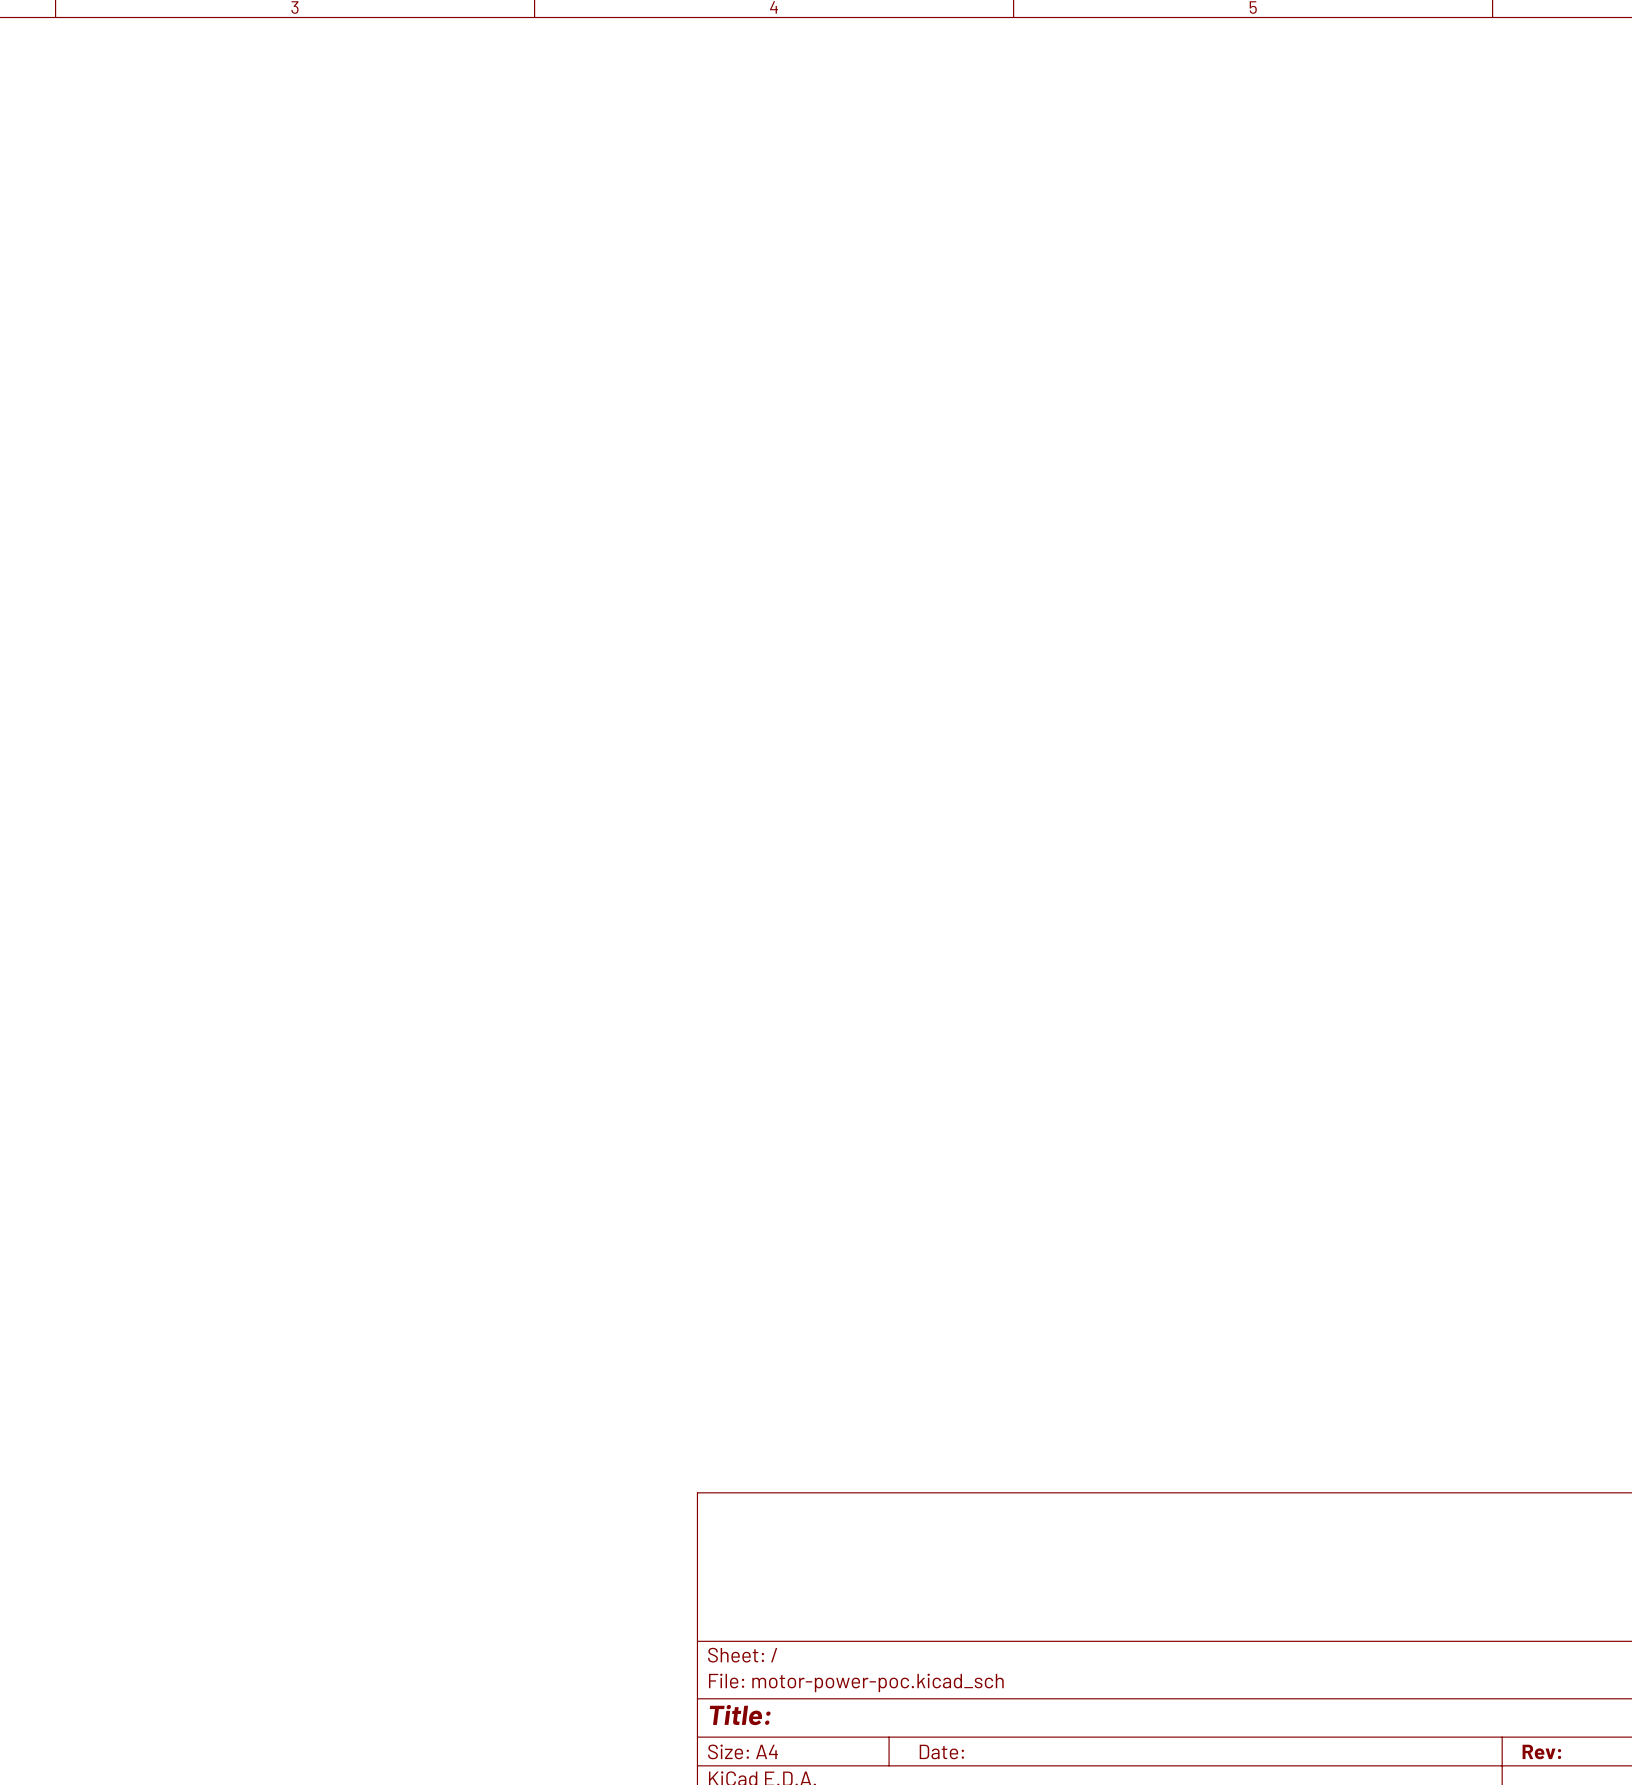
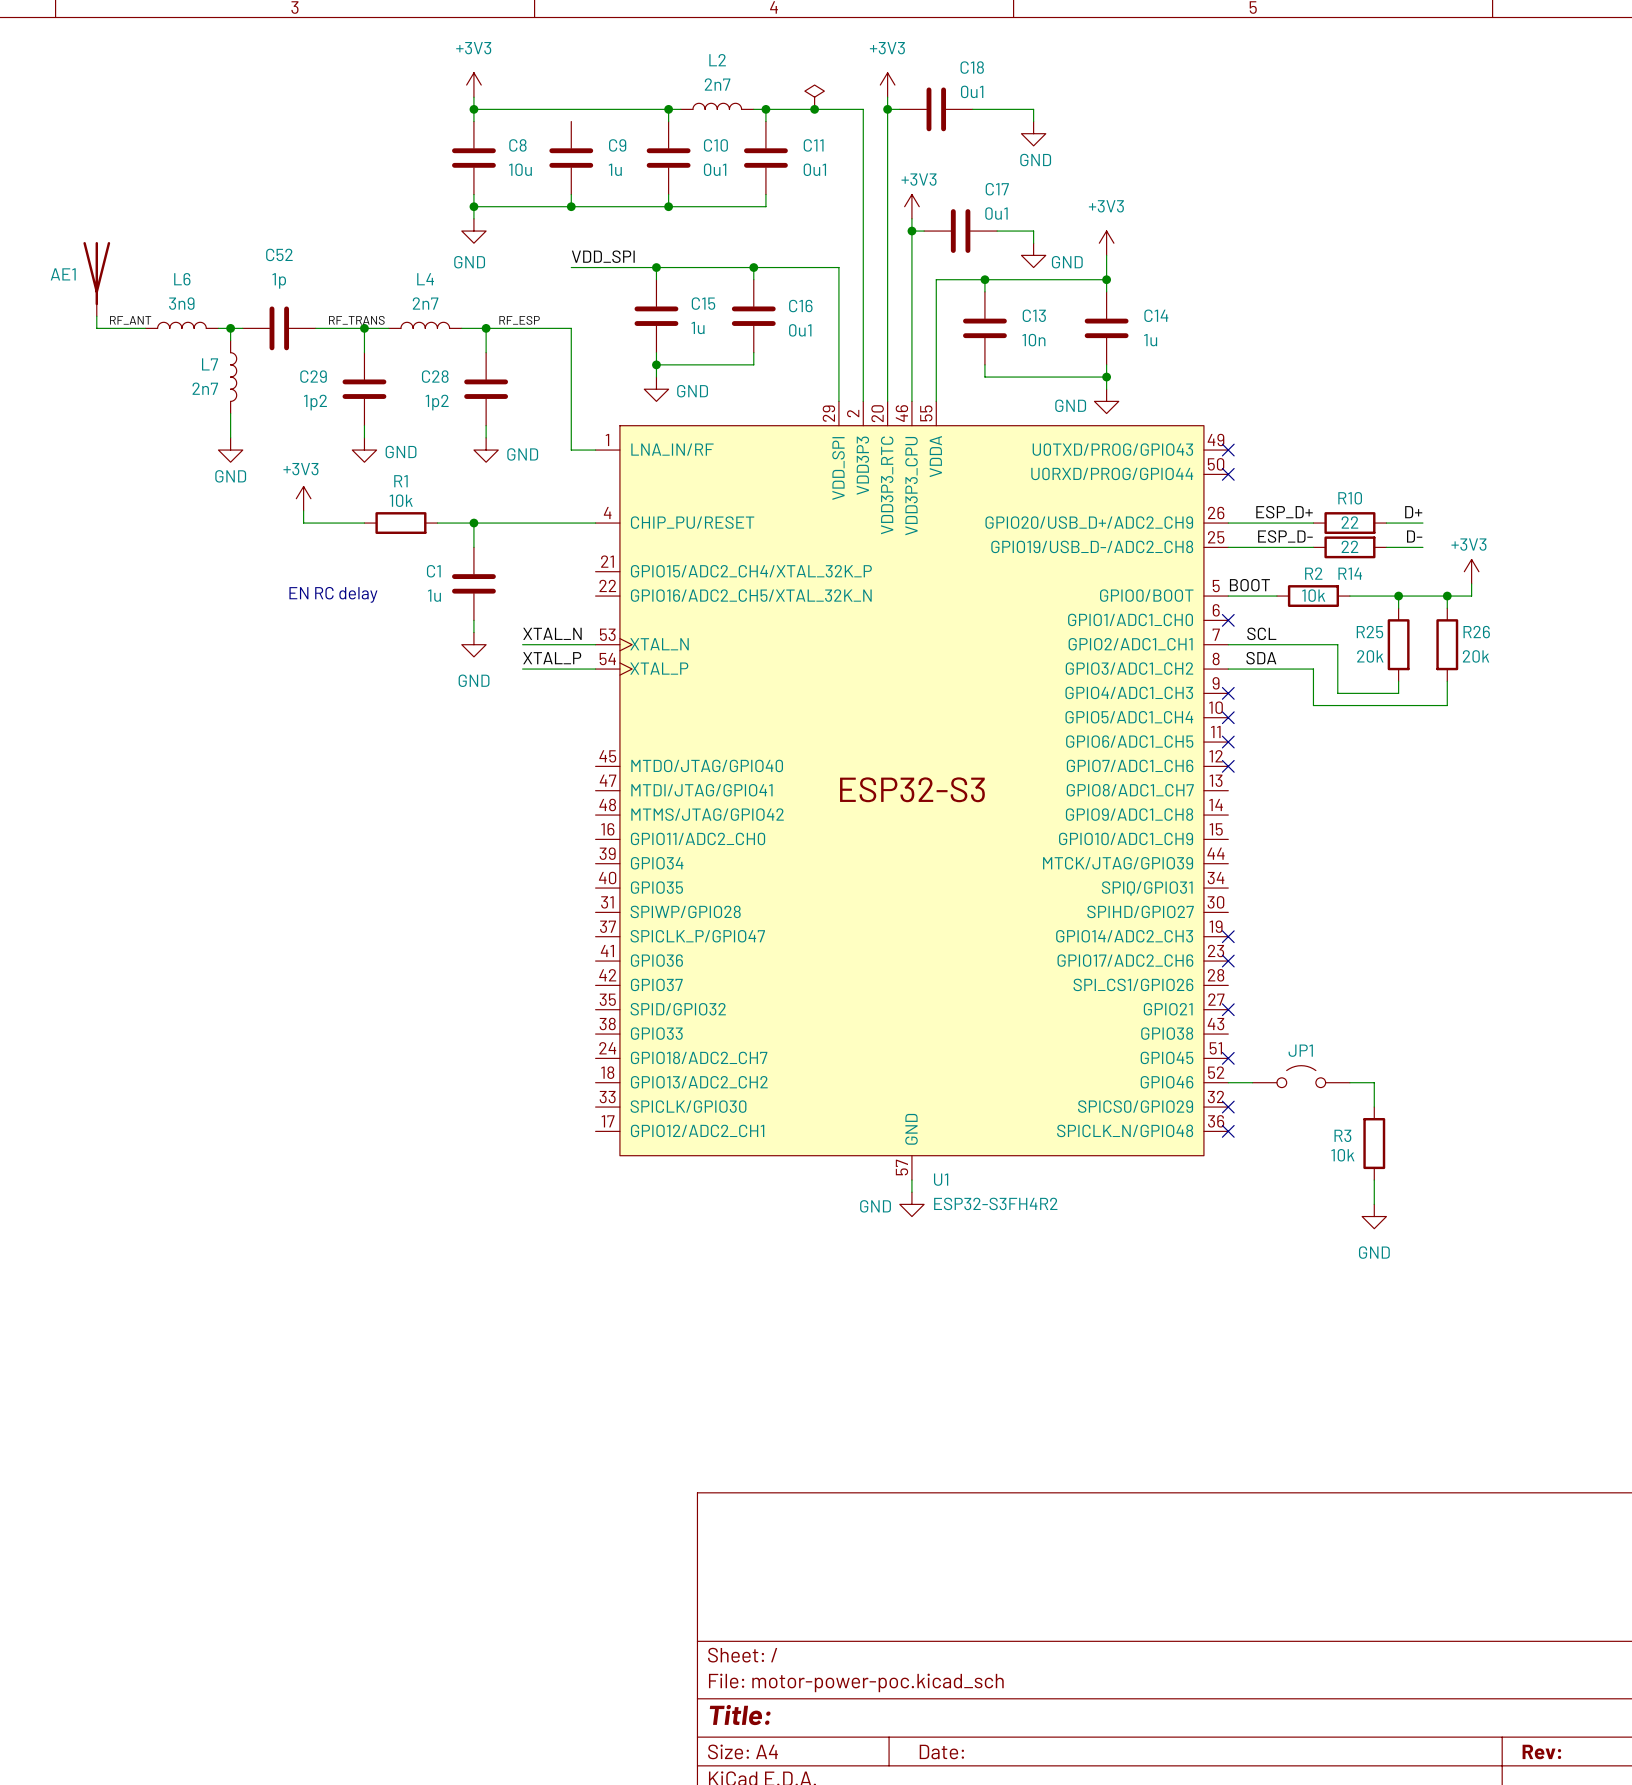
power symbol: none -> +3V3 (473, 85)
power symbol: none -> +3V3 (887, 85)
wire: none -> (473, 97) (473, 121)
power symbol: none -> (814, 97)
wire: none -> (887, 97) (887, 401)
L2: none -> 2n7 (717, 106)
wire: none -> (473, 109) (680, 109)
junction: none -> (473, 109)
wire: none -> (668, 109) (668, 121)
junction: none -> (668, 109)
wire: none -> (753, 109) (863, 109) (863, 401)
wire: none -> (765, 109) (765, 121)
junction: none -> (765, 109)
junction: none -> (814, 109)
wire: none -> (887, 109) (899, 109)
junction: none -> (887, 109)
C18: none -> 0u1 (936, 109)
wire: none -> (972, 109) (1033, 109) (1033, 121)
power symbol: none -> GND (1033, 133)
C8: none -> 10u (473, 158)
C9: none -> 1u (571, 158)
C10: none -> 0u1 (668, 158)
C11: none -> 0u1 (765, 158)
wire: none -> (473, 194) (473, 218)
wire: none -> (571, 194) (571, 206)
wire: none -> (668, 194) (668, 206)
wire: none -> (765, 194) (765, 206) (473, 206)
junction: none -> (473, 206)
junction: none -> (571, 206)
junction: none -> (668, 206)
power symbol: none -> +3V3 (911, 206)
wire: none -> (911, 218) (911, 401)
power symbol: none -> GND (473, 231)
wire: none -> (911, 231) (924, 231)
junction: none -> (911, 231)
C17: none -> 0u1 (960, 231)
wire: none -> (997, 231) (1033, 231) (1033, 243)
power symbol: none -> +3V3 (1106, 243)
power symbol: none -> GND (1033, 255)
wire: none -> (1106, 255) (1106, 291)
label: none -> VDD_SPI (603, 256)
wire: none -> (571, 267) (838, 267) (838, 401)
wire: none -> (656, 267) (656, 279)
junction: none -> (656, 267)
wire: none -> (753, 267) (753, 279)
junction: none -> (753, 267)
AE1: none -> (96, 279)
wire: none -> (984, 279) (984, 291)
junction: none -> (984, 279)
wire: none -> (1106, 279) (936, 279) (936, 401)
junction: none -> (1106, 279)
wire: none -> (96, 316) (96, 328) (145, 328)
C15: none -> 1u (656, 316)
C16: none -> 0u1 (753, 316)
label: none -> RF_ANT (130, 320)
label: none -> RF_TRANS (356, 320)
label: none -> RF_ESP (519, 320)
L6: none -> 3n9 (181, 325)
L4: none -> 2n7 (425, 325)
wire: none -> (218, 328) (242, 328)
wire: none -> (230, 328) (230, 340)
junction: none -> (230, 328)
C52: none -> 1p (279, 328)
wire: none -> (315, 328) (388, 328)
wire: none -> (364, 328) (364, 352)
junction: none -> (364, 328)
wire: none -> (461, 328) (571, 328) (571, 450) (595, 450)
wire: none -> (486, 328) (486, 352)
junction: none -> (486, 328)
C13: none -> 10n (984, 328)
C14: none -> 1u (1106, 328)
wire: none -> (656, 352) (656, 377)
wire: none -> (753, 352) (753, 364) (656, 364)
junction: none -> (656, 364)
wire: none -> (984, 364) (984, 377) (1106, 377)
wire: none -> (1106, 364) (1106, 389)
L7: none -> 2n7 (233, 377)
junction: none -> (1106, 377)
C29: none -> 1p2 (364, 389)
C28: none -> 1p2 (486, 389)
power symbol: none -> GND (656, 389)
power symbol: none -> GND (1106, 401)
wire: none -> (230, 413) (230, 437)
wire: none -> (364, 425) (364, 437)
wire: none -> (486, 425) (486, 437)
power symbol: none -> GND (230, 450)
power symbol: none -> GND (364, 450)
power symbol: none -> GND (486, 450)
no-connect mark: none -> (1228, 450)
no-connect mark: none -> (1228, 474)
power symbol: none -> +3V3 (303, 498)
wire: none -> (303, 510) (303, 523) (364, 523)
label: none -> ESP_D+ (1284, 512)
label: none -> D+ (1413, 512)
R1: none -> 10k (400, 523)
wire: none -> (437, 523) (595, 523)
wire: none -> (473, 523) (473, 547)
junction: none -> (473, 523)
wire: none -> (1228, 523) (1313, 523)
R10: none -> 22 (1349, 523)
wire: none -> (1386, 523) (1422, 523)
label: none -> ESP_D- (1285, 536)
label: none -> D- (1414, 536)
wire: none -> (1228, 547) (1313, 547)
R14: none -> 22 (1349, 547)
wire: none -> (1386, 547) (1422, 547)
power symbol: none -> +3V3 (1471, 571)
C1: none -> 1u (473, 583)
wire: none -> (1471, 583) (1471, 596) (1349, 596)
label: none -> BOOT (1249, 585)
text: none -> EN RC delay (333, 594)
wire: none -> (1228, 596) (1276, 596)
R2: none -> 10k (1313, 596)
wire: none -> (1398, 596) (1398, 608)
junction: none -> (1398, 596)
wire: none -> (1447, 596) (1447, 608)
junction: none -> (1447, 596)
wire: none -> (473, 620) (473, 632)
no-connect mark: none -> (1228, 620)
label: none -> XTAL_N (552, 633)
label: none -> SCL (1261, 633)
power symbol: none -> GND (473, 644)
wire: none -> (522, 644) (595, 644)
wire: none -> (1228, 644) (1337, 644) (1337, 693) (1398, 693) (1398, 681)
R25: none -> 20k (1398, 644)
R26: none -> 20k (1447, 644)
label: none -> XTAL_P (552, 658)
label: none -> SDA (1261, 658)
wire: none -> (522, 669) (595, 669)
wire: none -> (1228, 669) (1313, 669) (1313, 705) (1447, 705) (1447, 681)
no-connect mark: none -> (1228, 693)
no-connect mark: none -> (1228, 717)
no-connect mark: none -> (1228, 742)
no-connect mark: none -> (1228, 766)
U1: none -> ESP32-S3FH4R2 (911, 790)
no-connect mark: none -> (1228, 936)
no-connect mark: none -> (1228, 961)
no-connect mark: none -> (1228, 1009)
no-connect mark: none -> (1228, 1058)
JP1: none -> (1301, 1076)
wire: none -> (1228, 1082) (1252, 1082)
wire: none -> (1349, 1082) (1374, 1082) (1374, 1107)
no-connect mark: none -> (1228, 1107)
no-connect mark: none -> (1228, 1131)
R3: none -> 10k (1374, 1143)
wire: none -> (911, 1180) (911, 1192)
wire: none -> (1374, 1180) (1374, 1204)
power symbol: none -> GND (911, 1204)
power symbol: none -> GND (1374, 1216)

